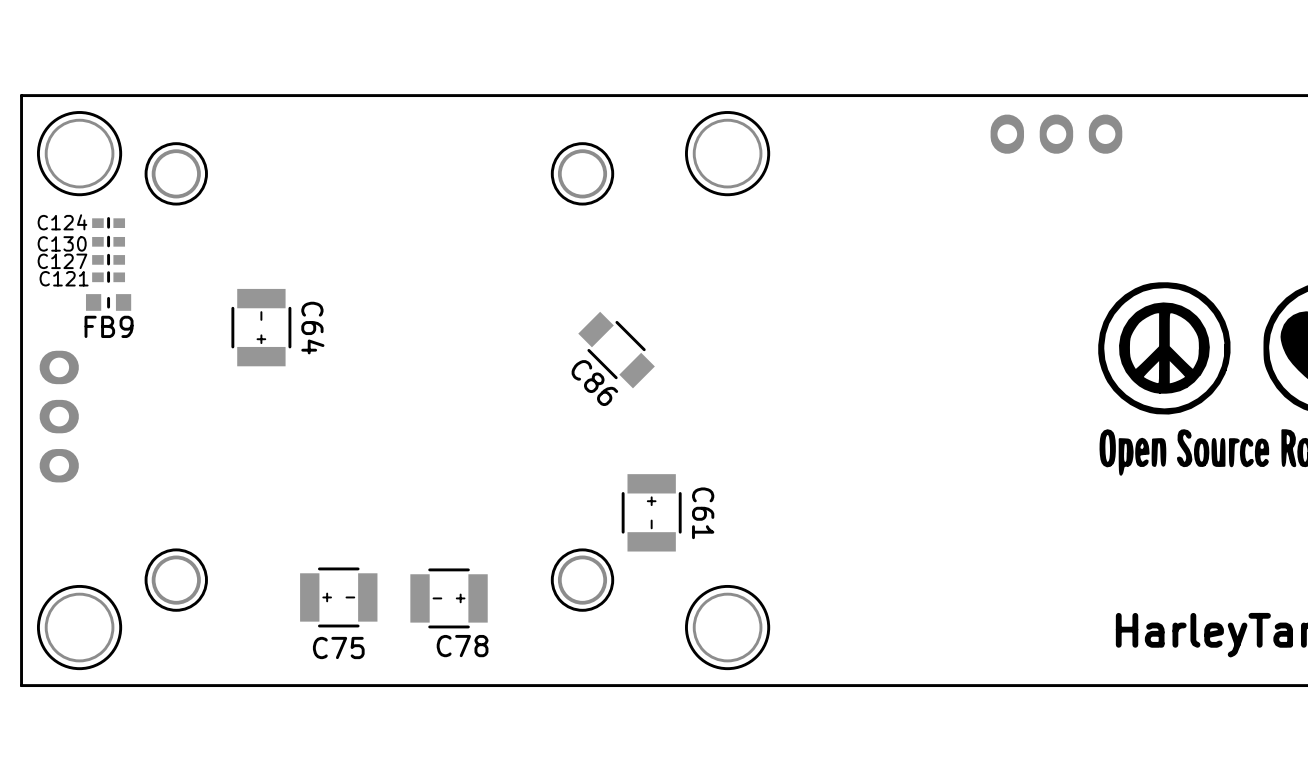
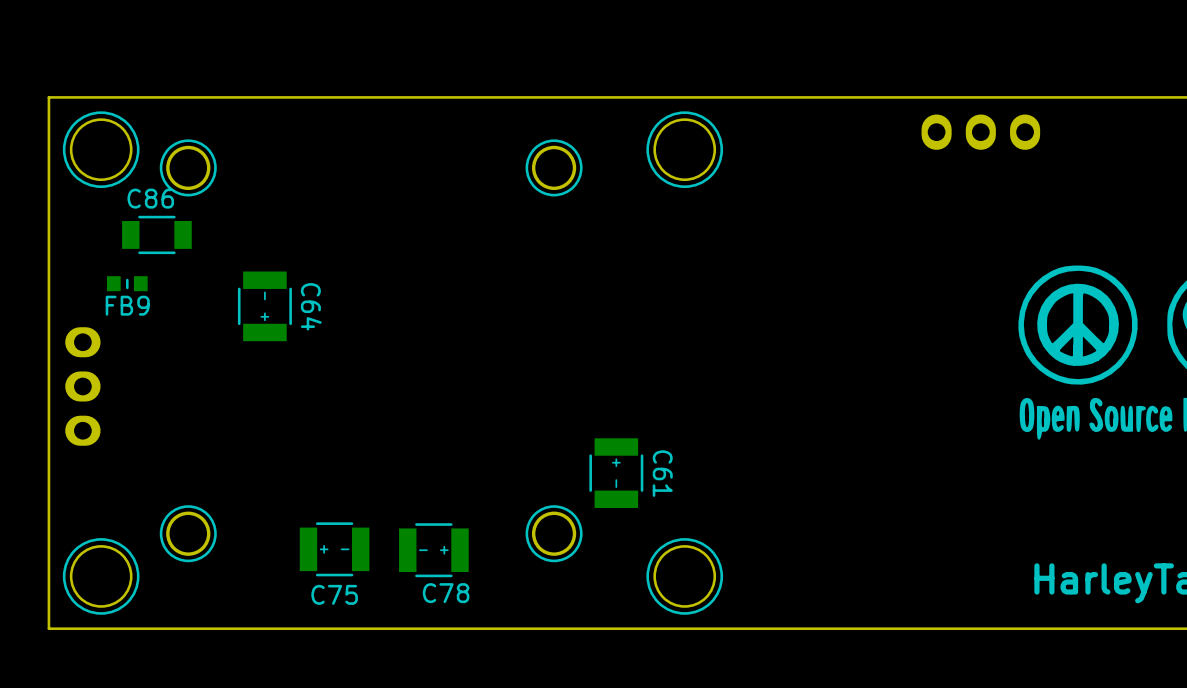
C124: (108, 222) -> none
C130: (108, 241) -> none
C127: (108, 259) -> none
C121: (108, 277) -> none
C86 rotation: 0° (616, 350) -> 45° counterclockwise (156, 234)
C86 position: (616, 350) -> (156, 234)
C86 name position: C86 (594, 383) -> C86 (150, 198)

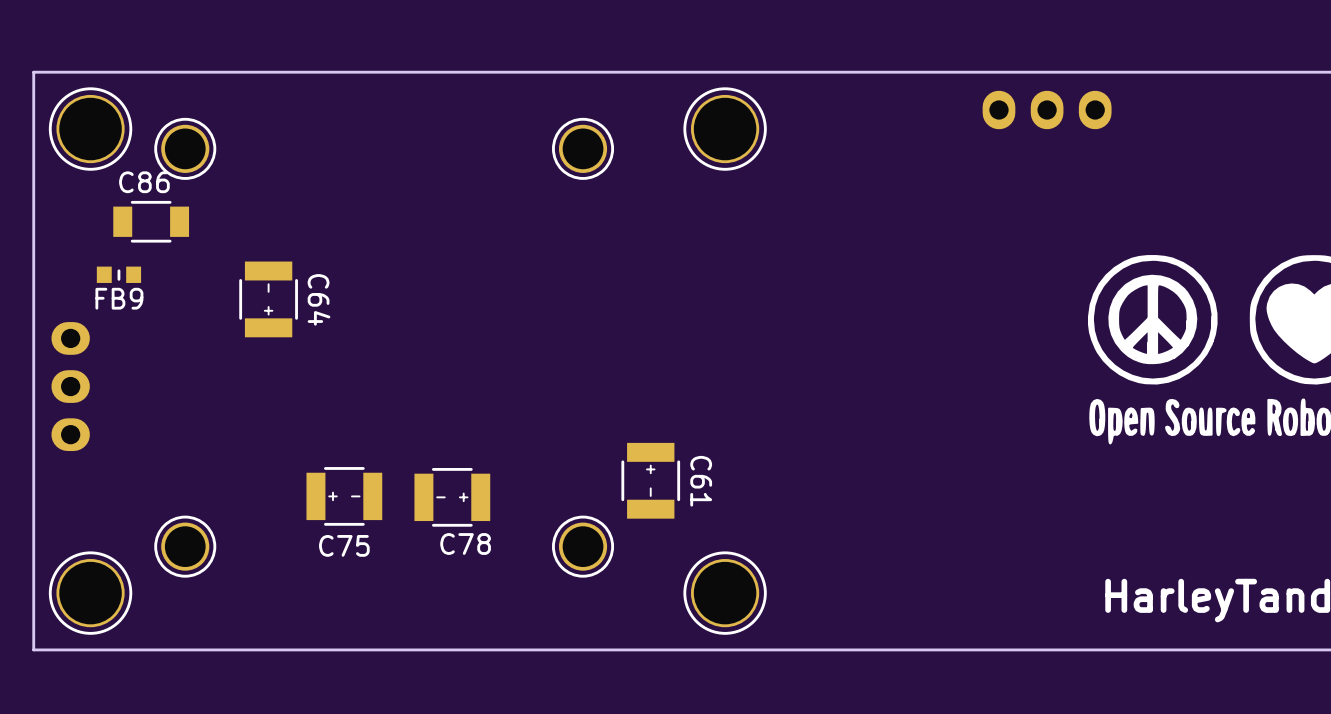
C75 position: (334, 549) -> (344, 496)
C78 position: (433, 550) -> (452, 497)

